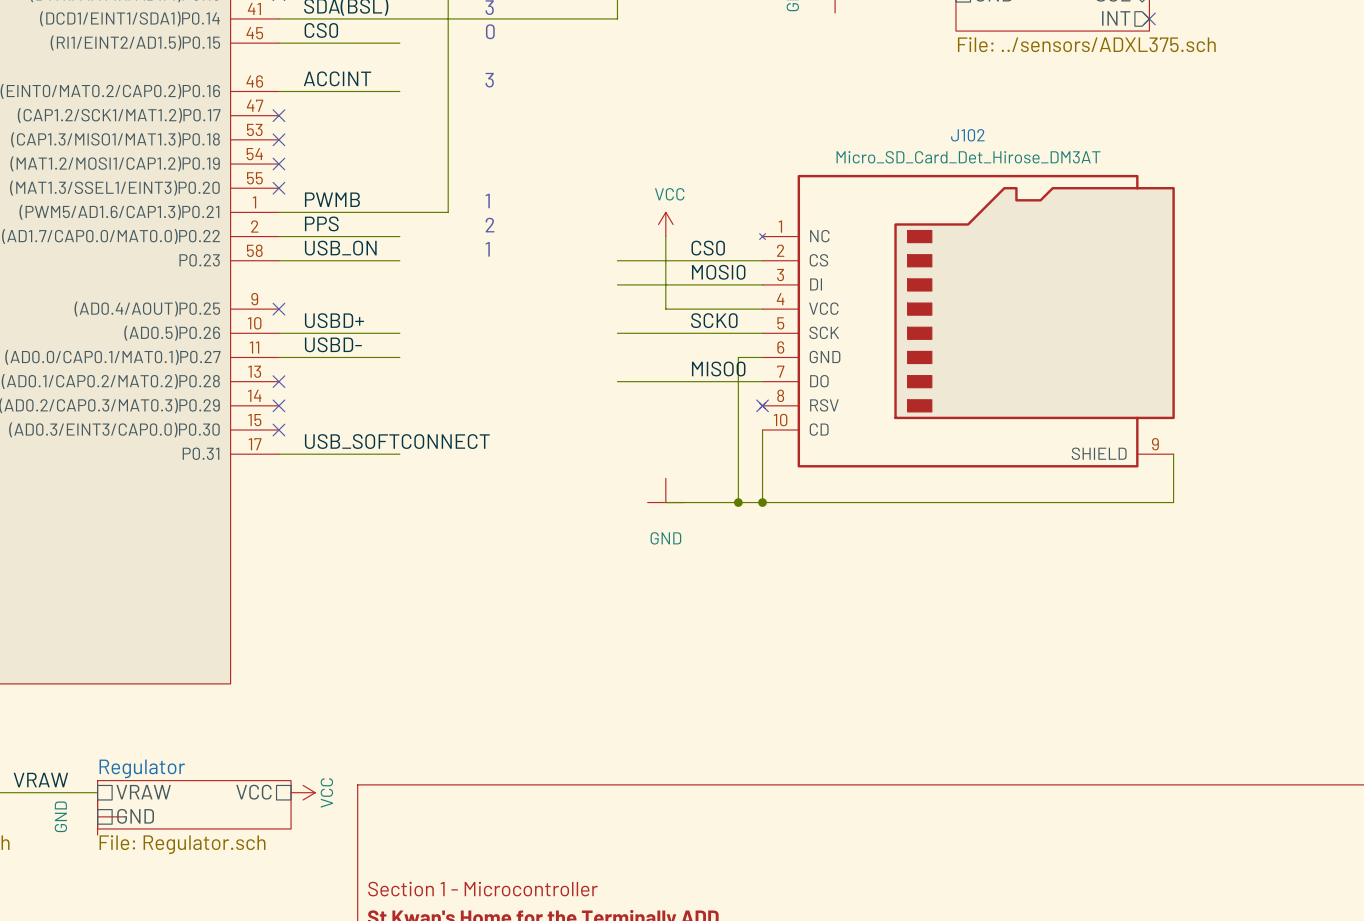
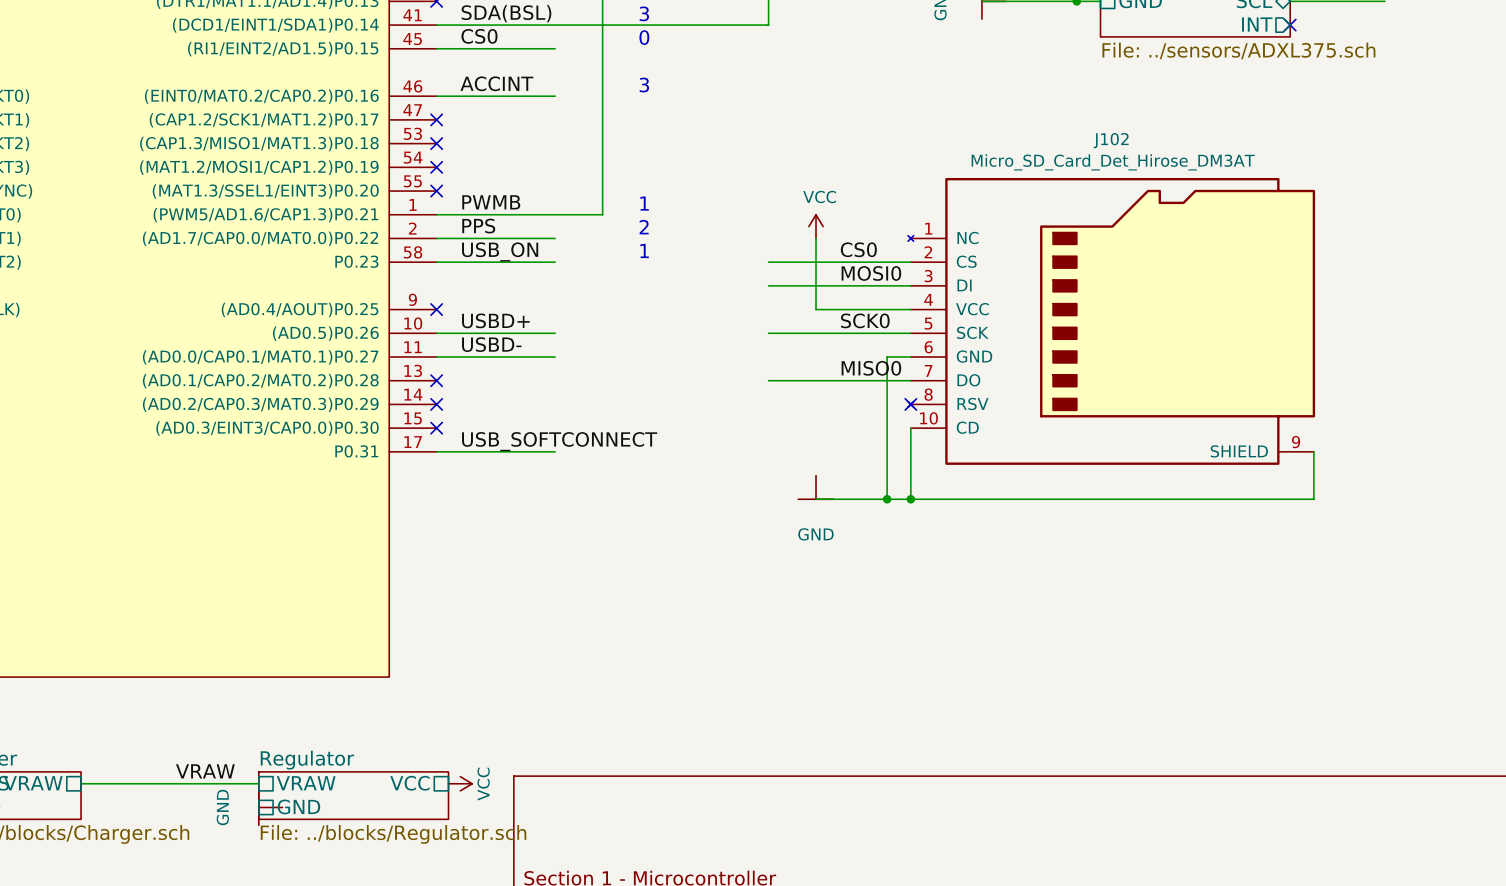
sheet Regulator value: File: Regulator.sch (182, 844) -> File: ../blocks/Regulator.sch (393, 834)

